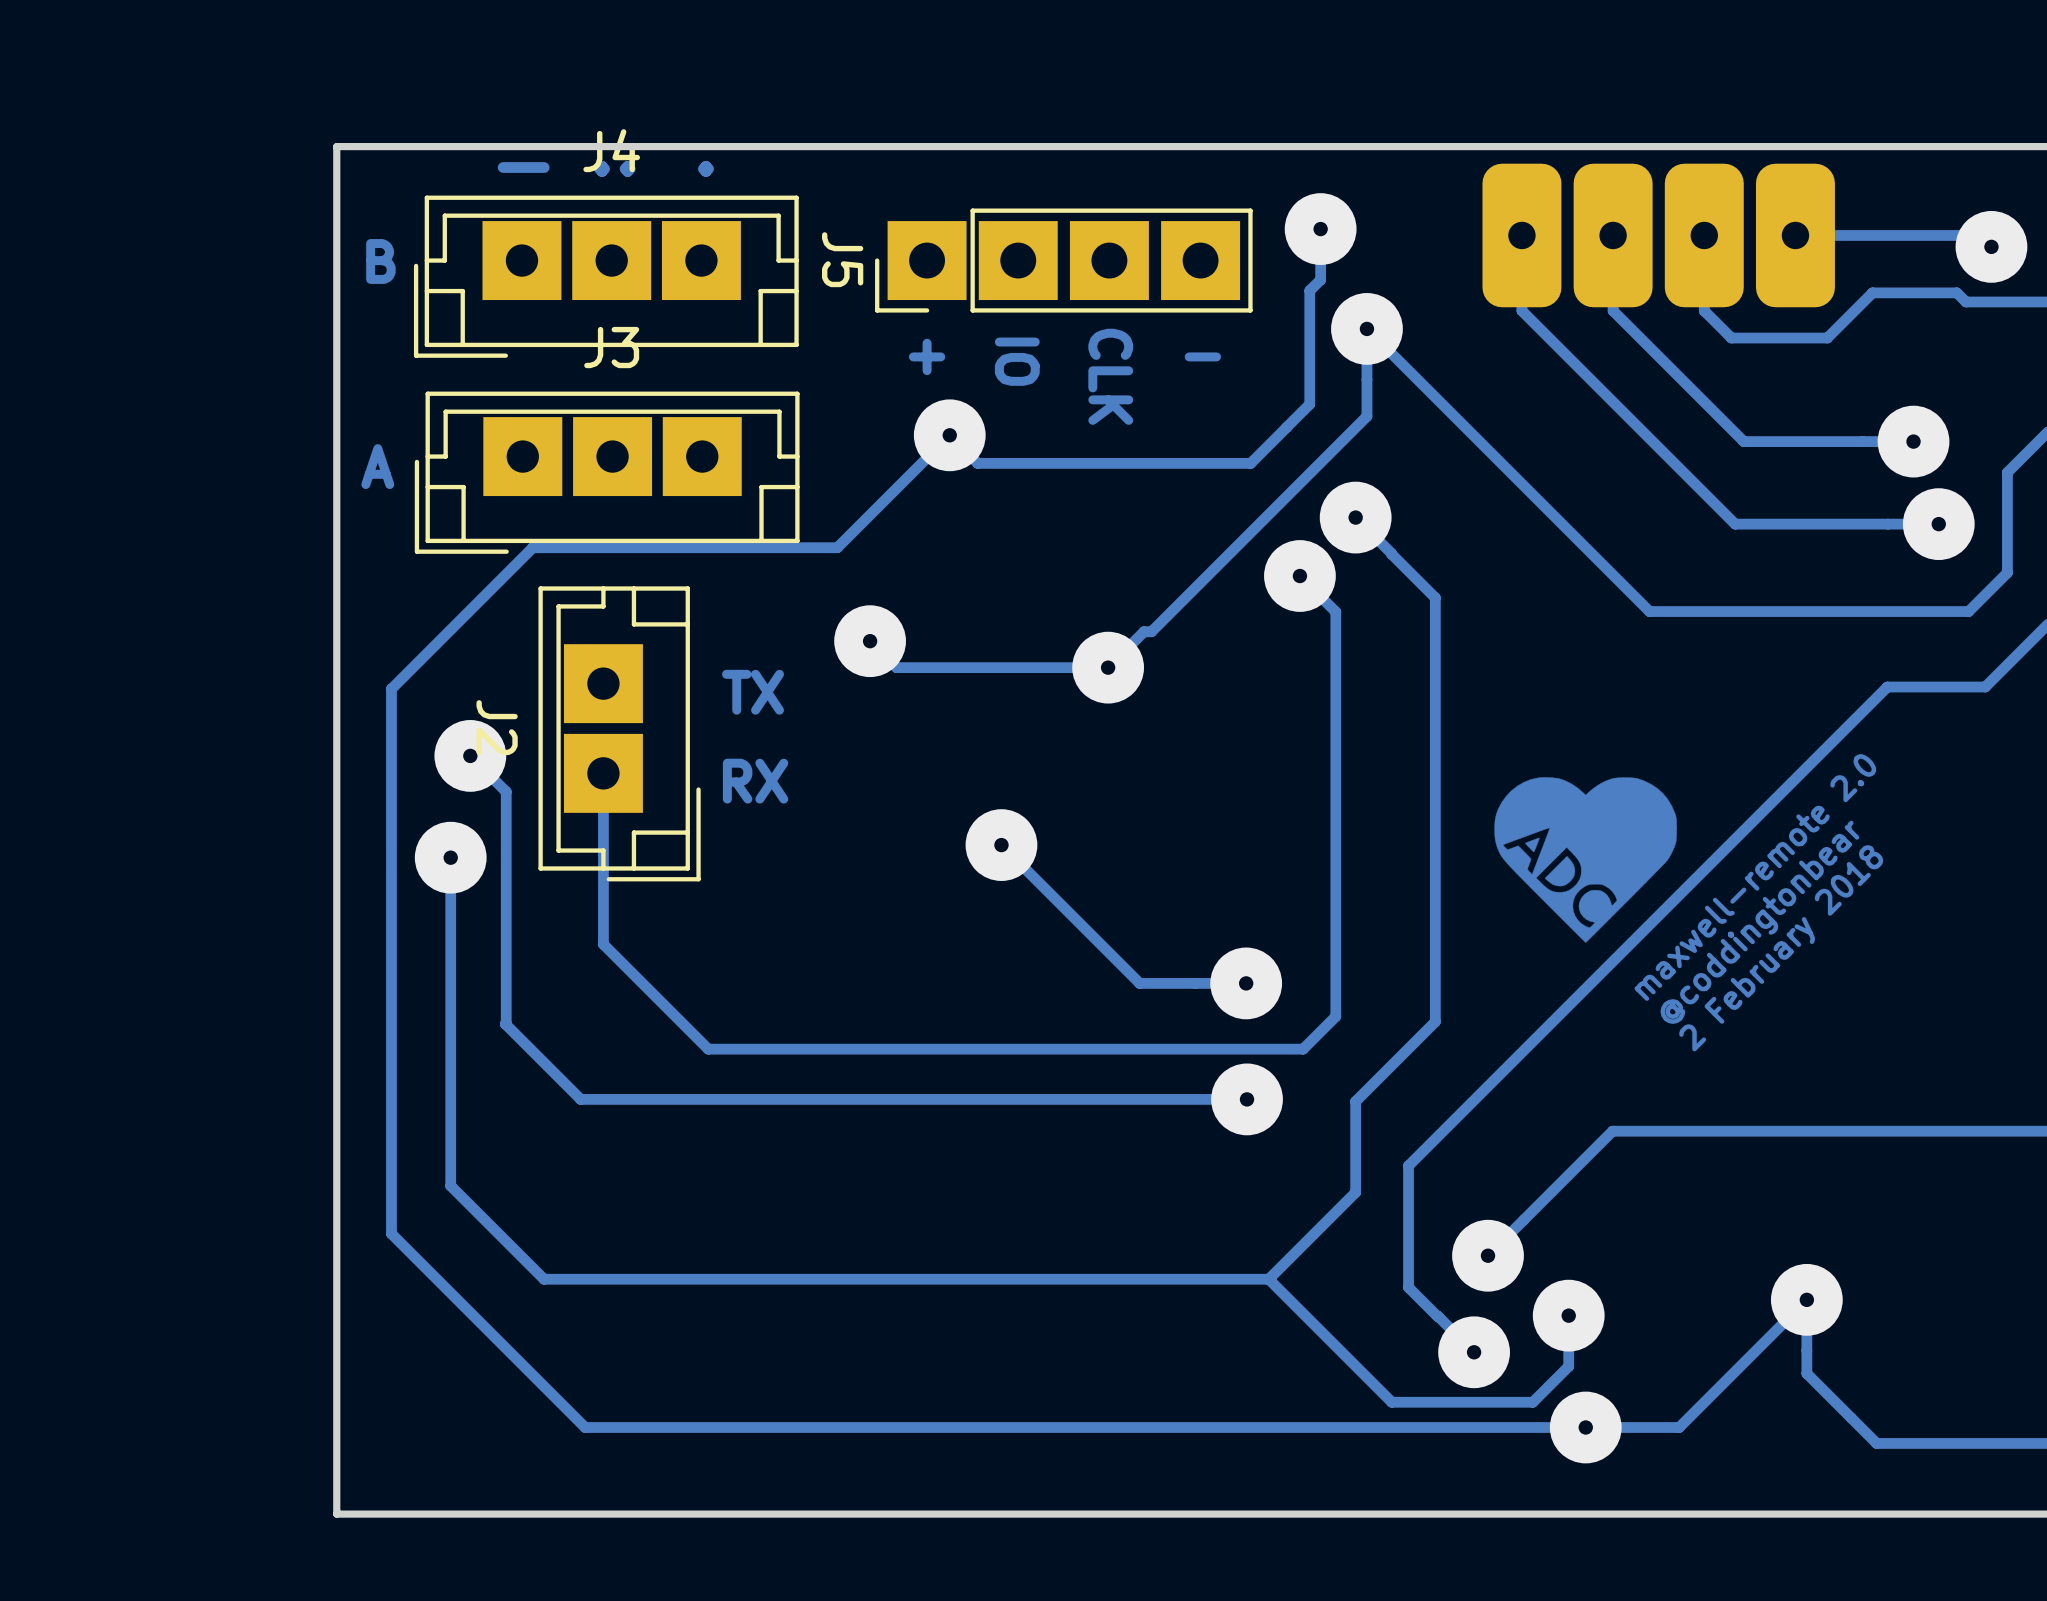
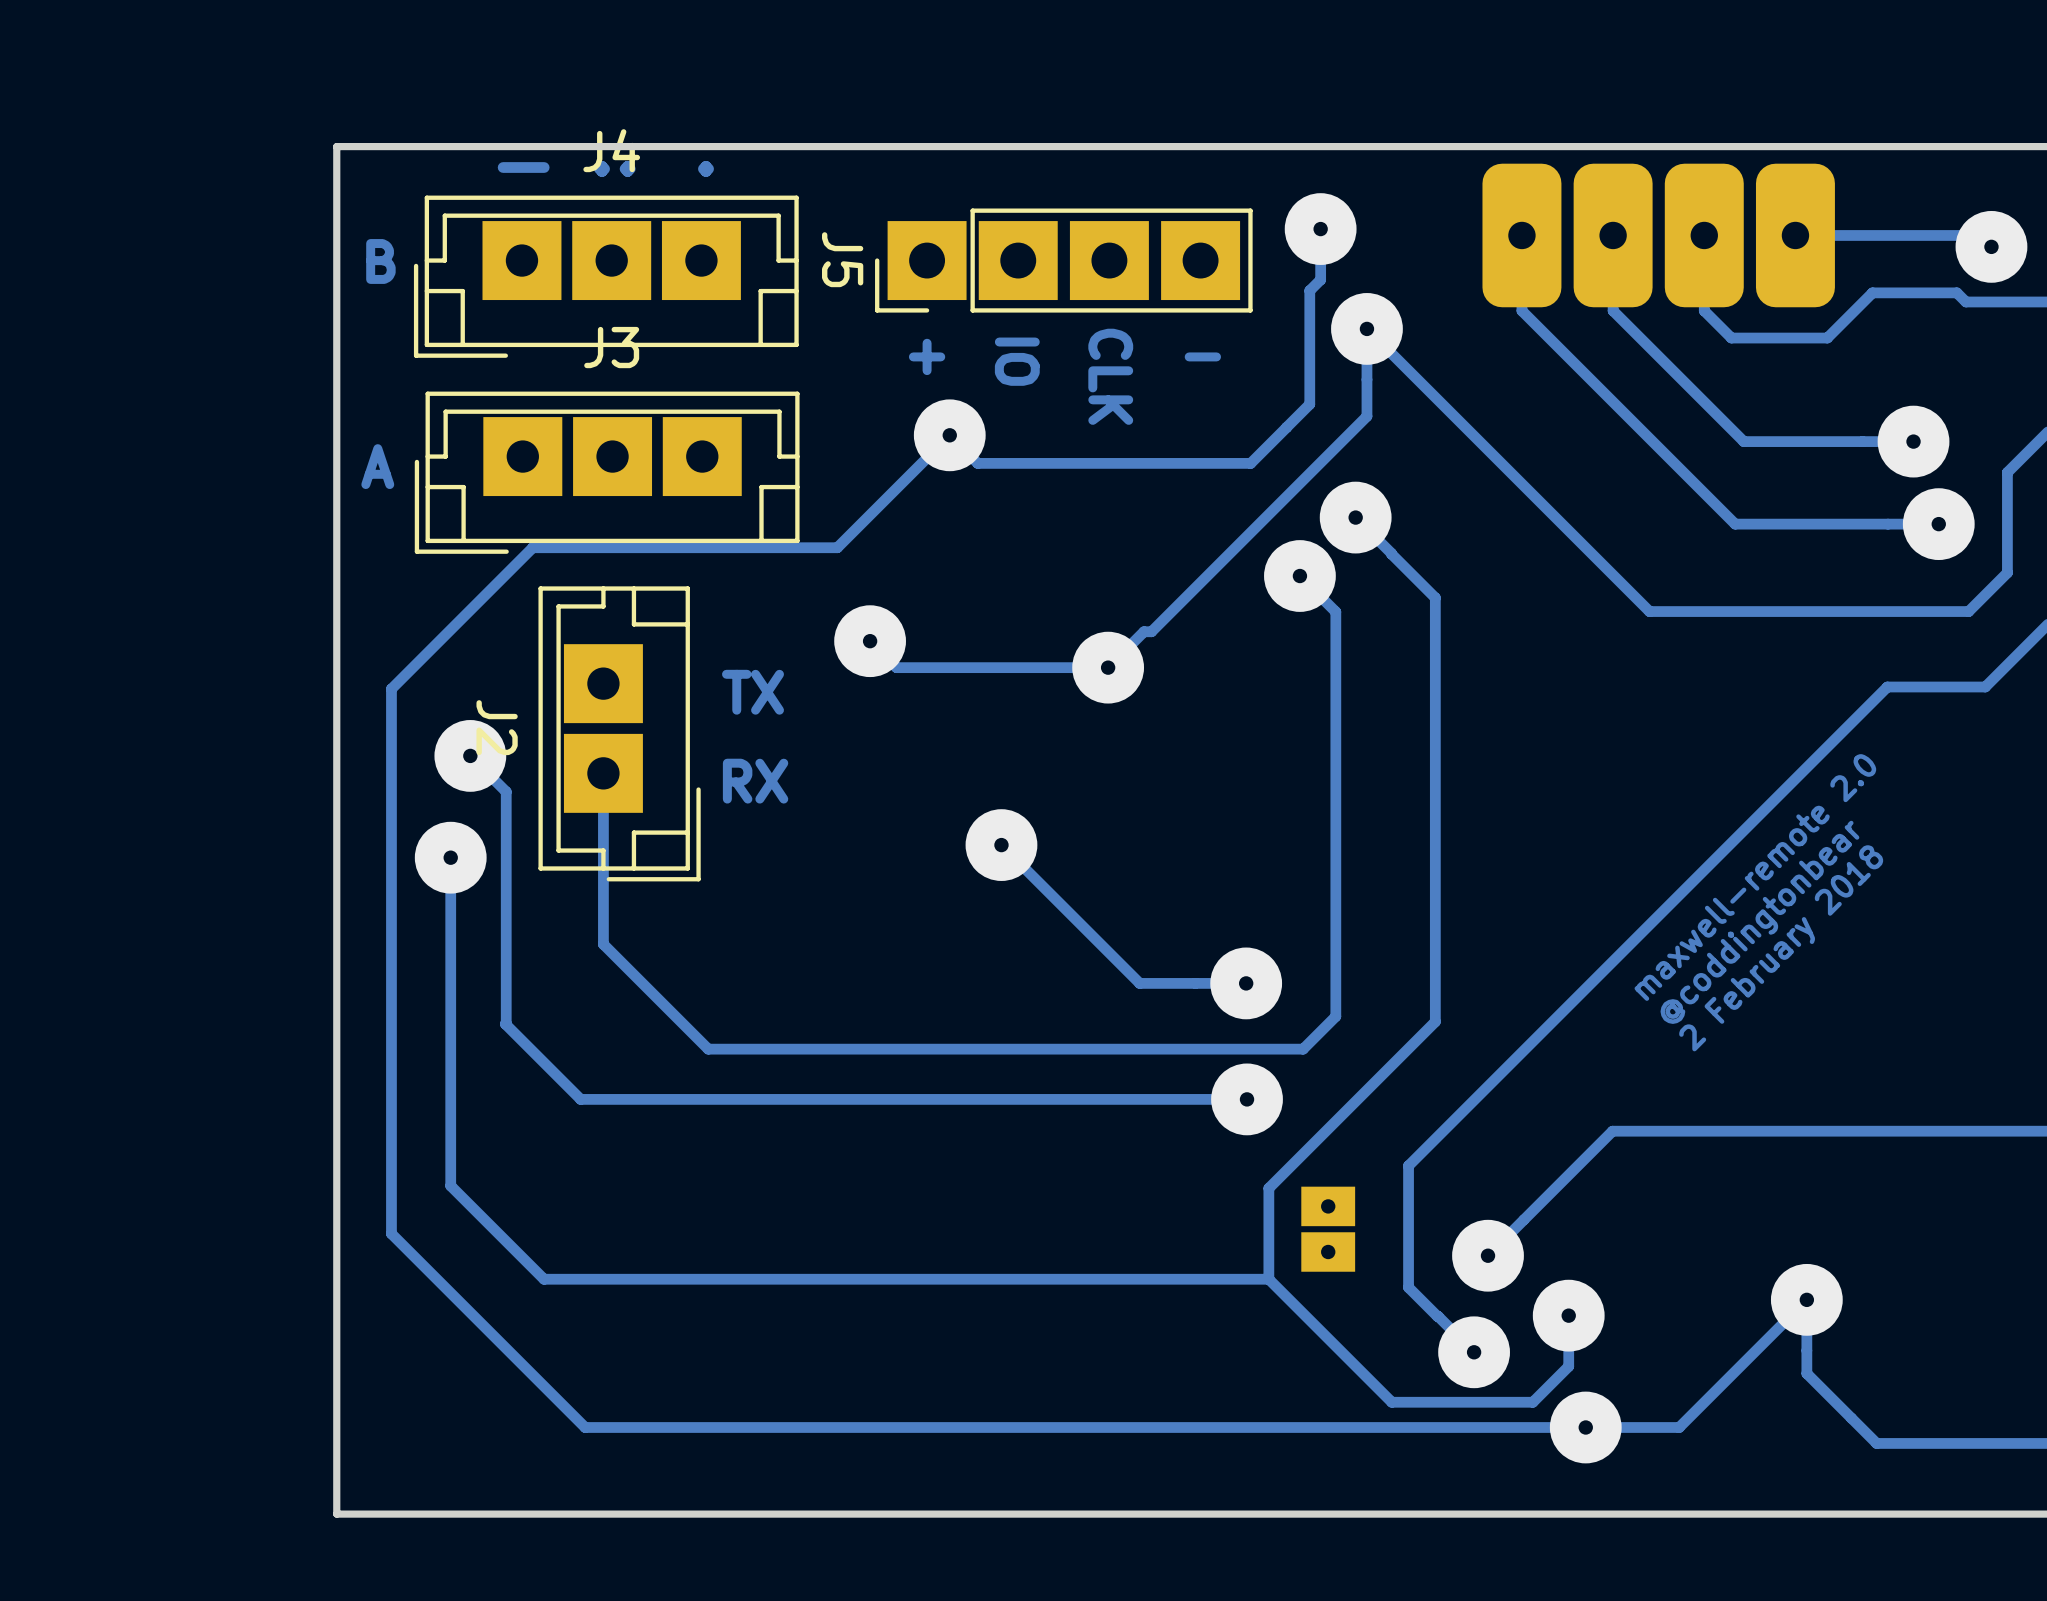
drawing: [1494, 777, 1677, 943] -> none
track: (1355, 1101) (1355, 1192) (1268, 1279) -> (1355, 1101) (1268, 1188) (1268, 1279)
part: none -> (1328, 1229)

